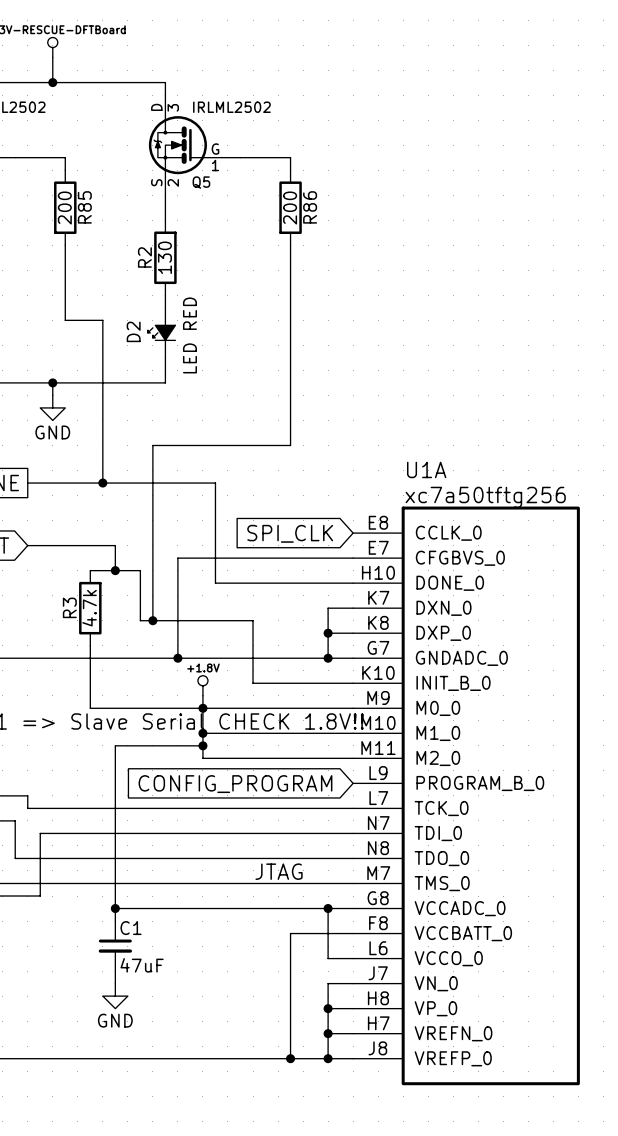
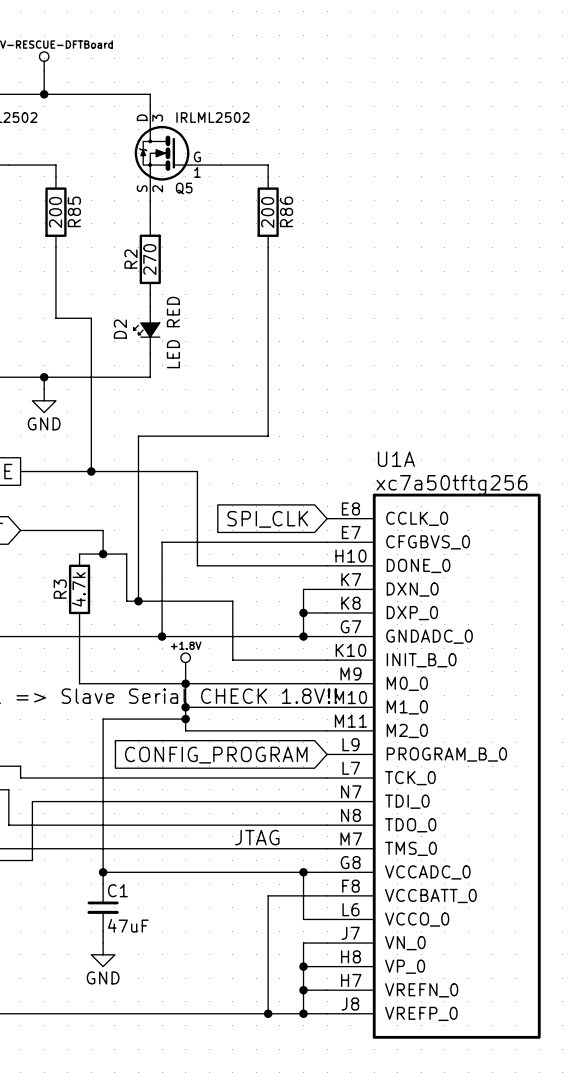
R2 value: 130 (164, 257) -> 270 (149, 259)

